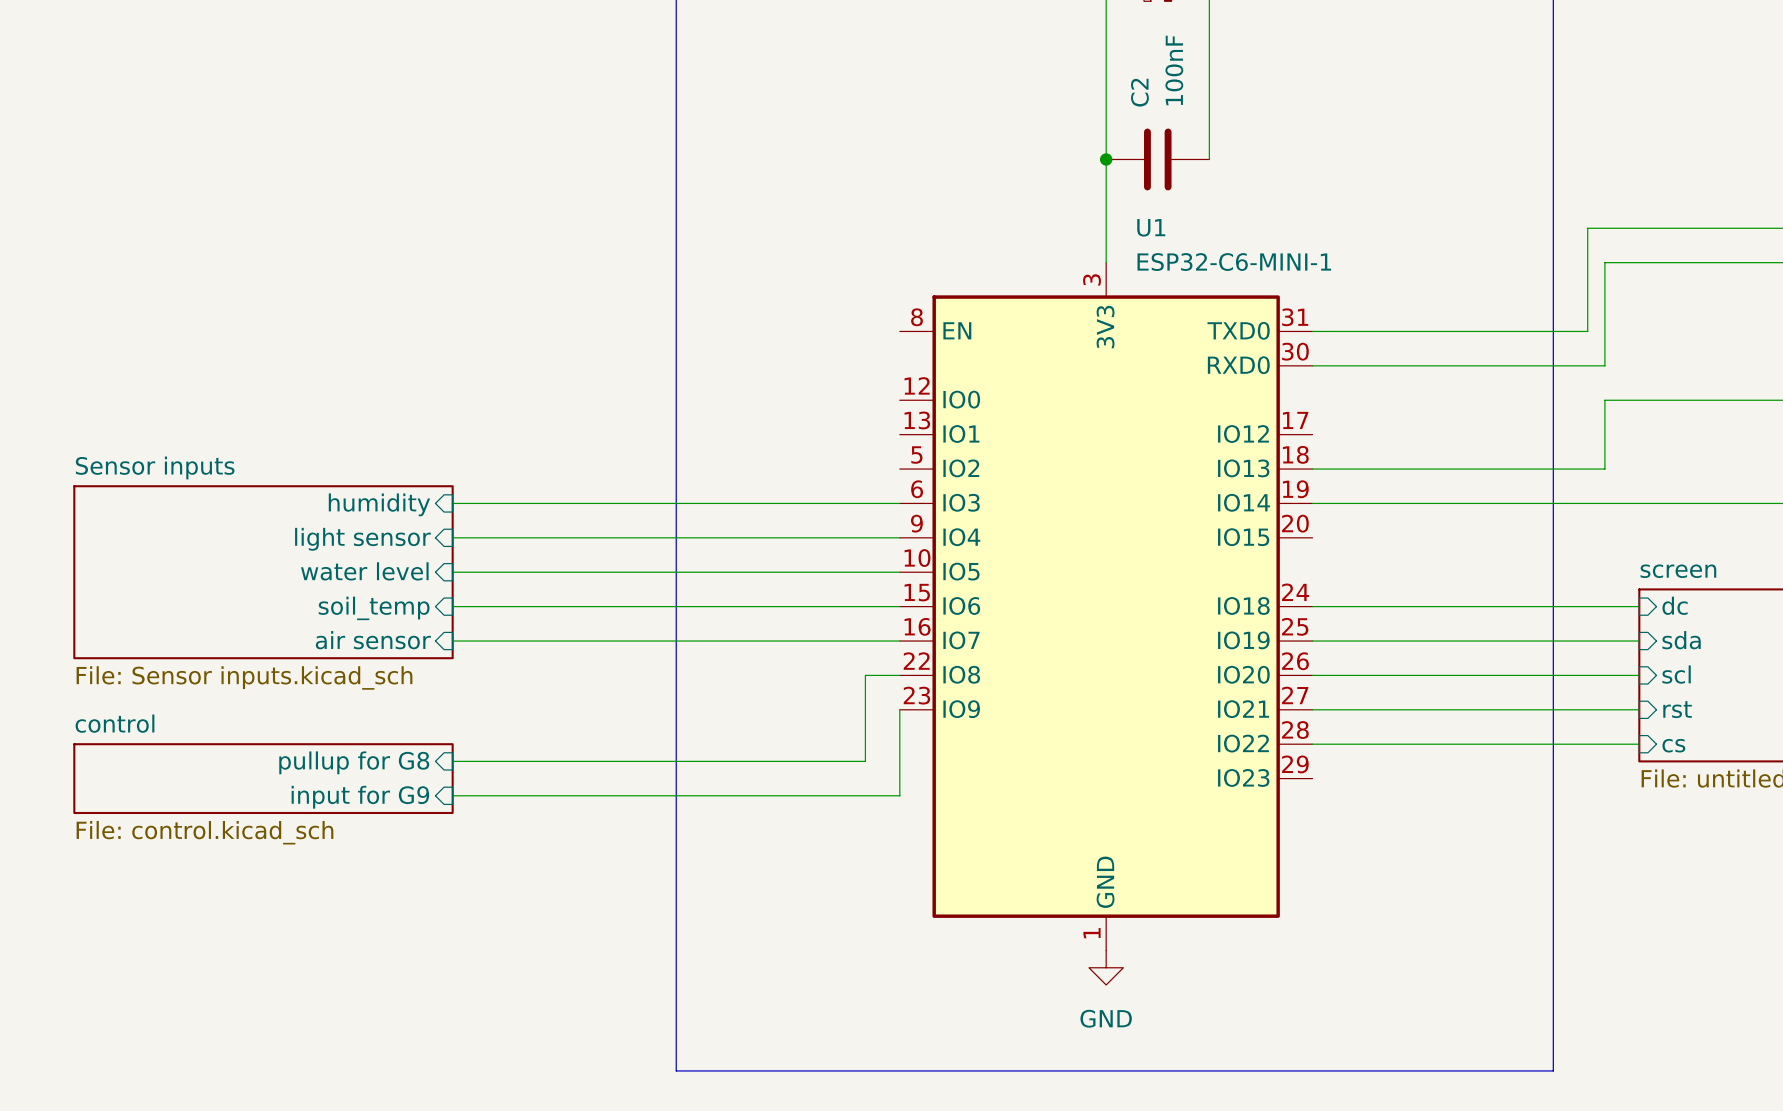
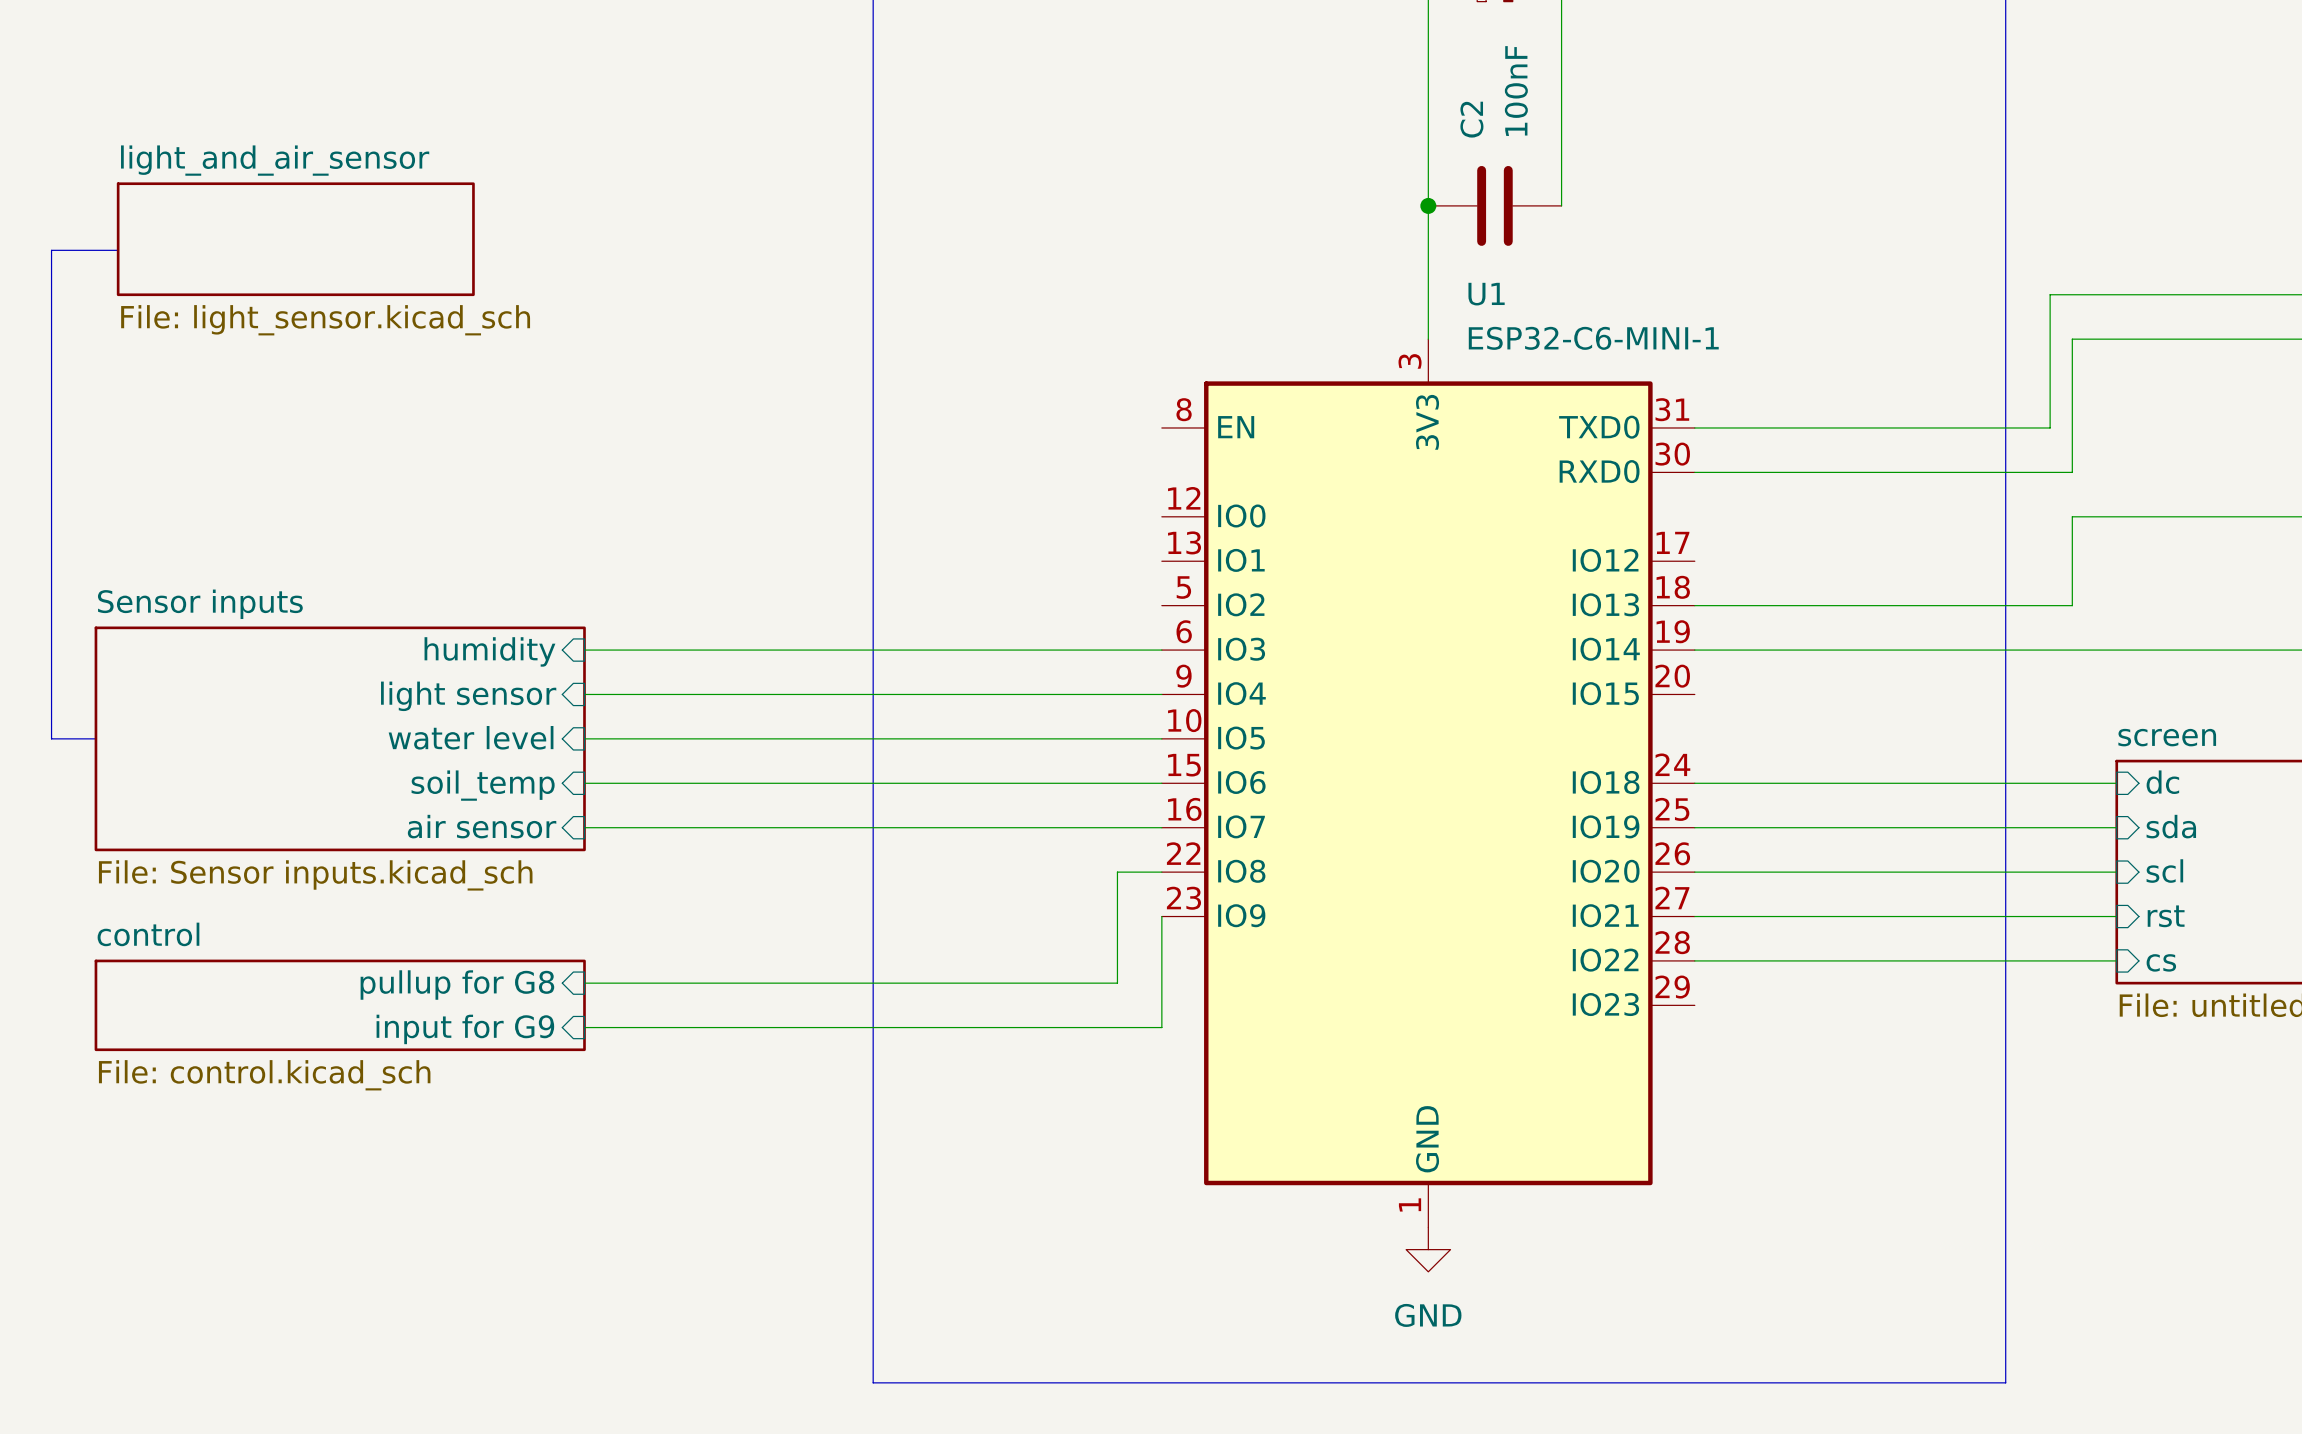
sheet light_and_air_sensor: none -> File: light_sensor.kicad_sch (295, 239)
line: none -> (118, 250) (51, 250) (51, 738) (95, 738)

